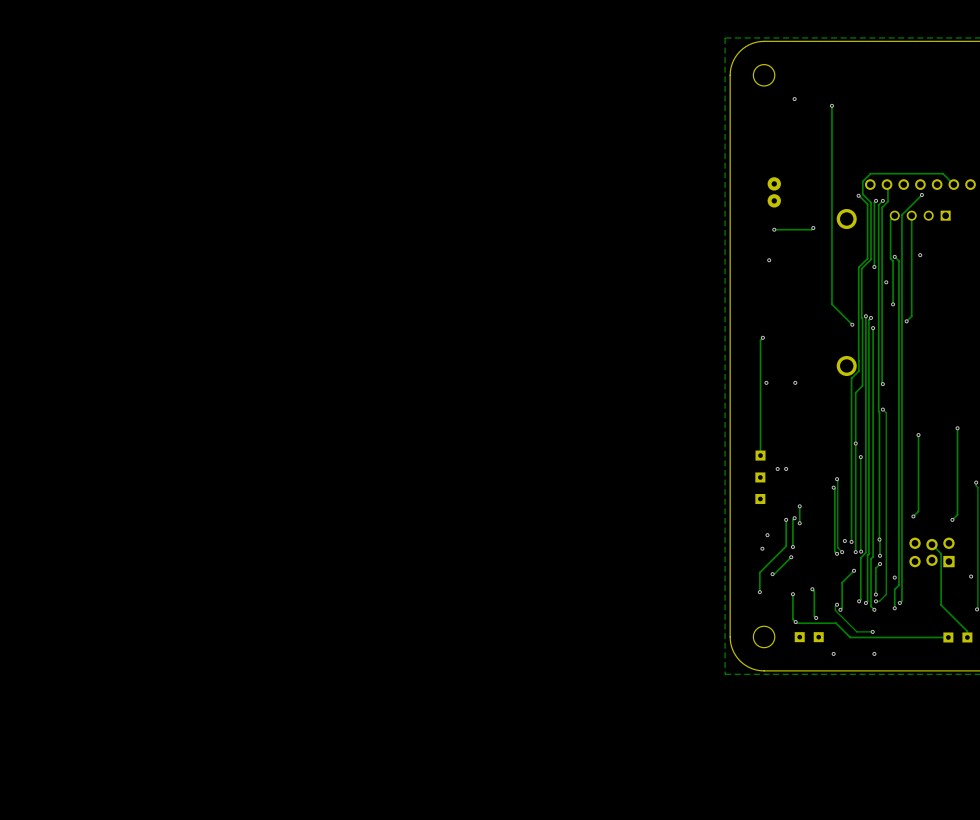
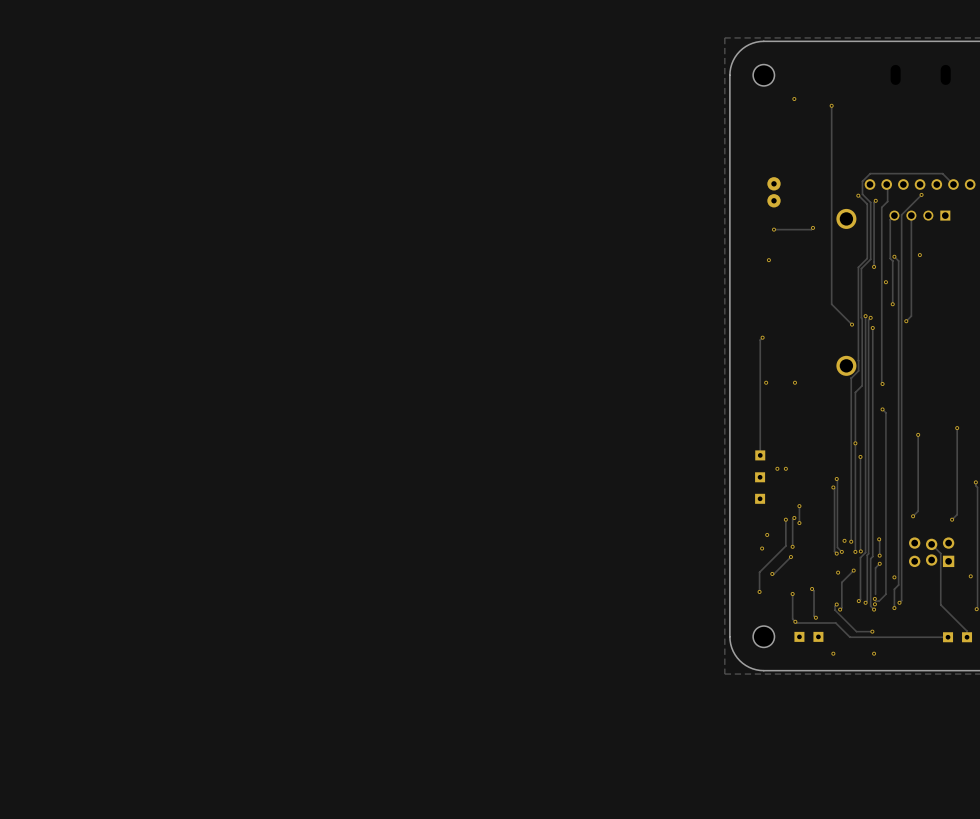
track: (882, 200) (878, 205) (879, 539) -> none
via: (882, 200) -> none
via: none -> (838, 572)
via: (875, 594) -> none
via: none -> (874, 598)
via: (875, 601) -> none
via: none -> (874, 604)

